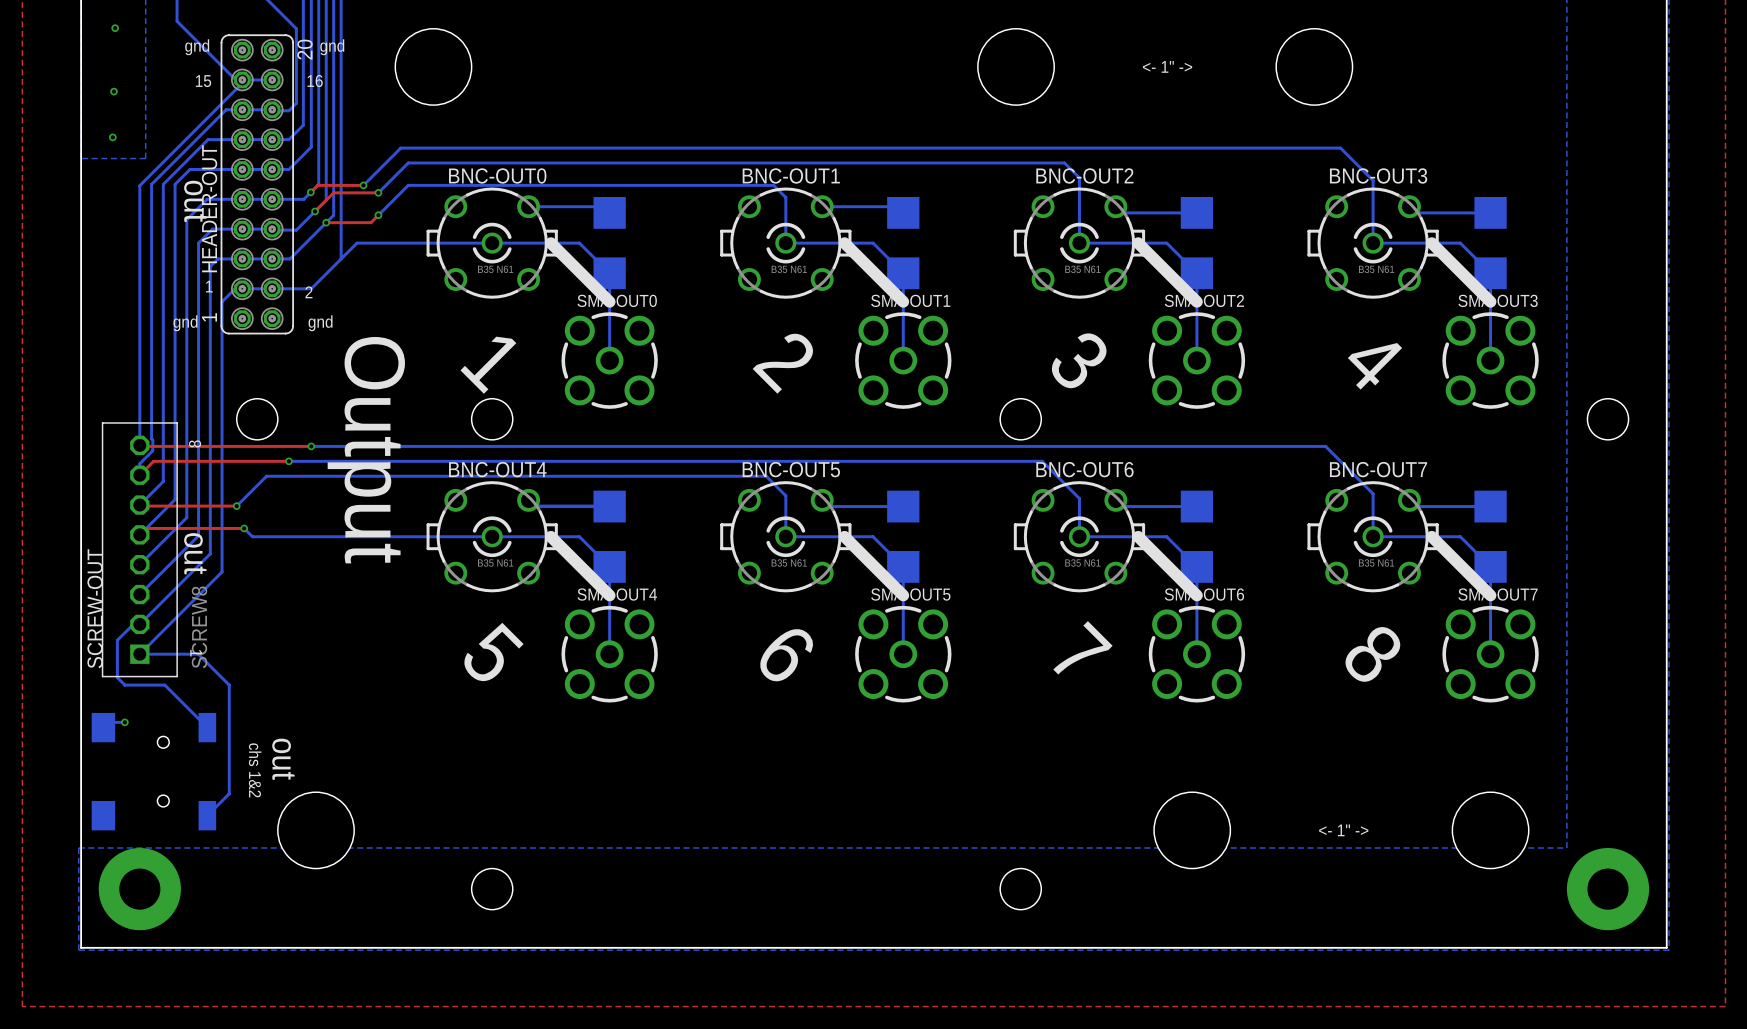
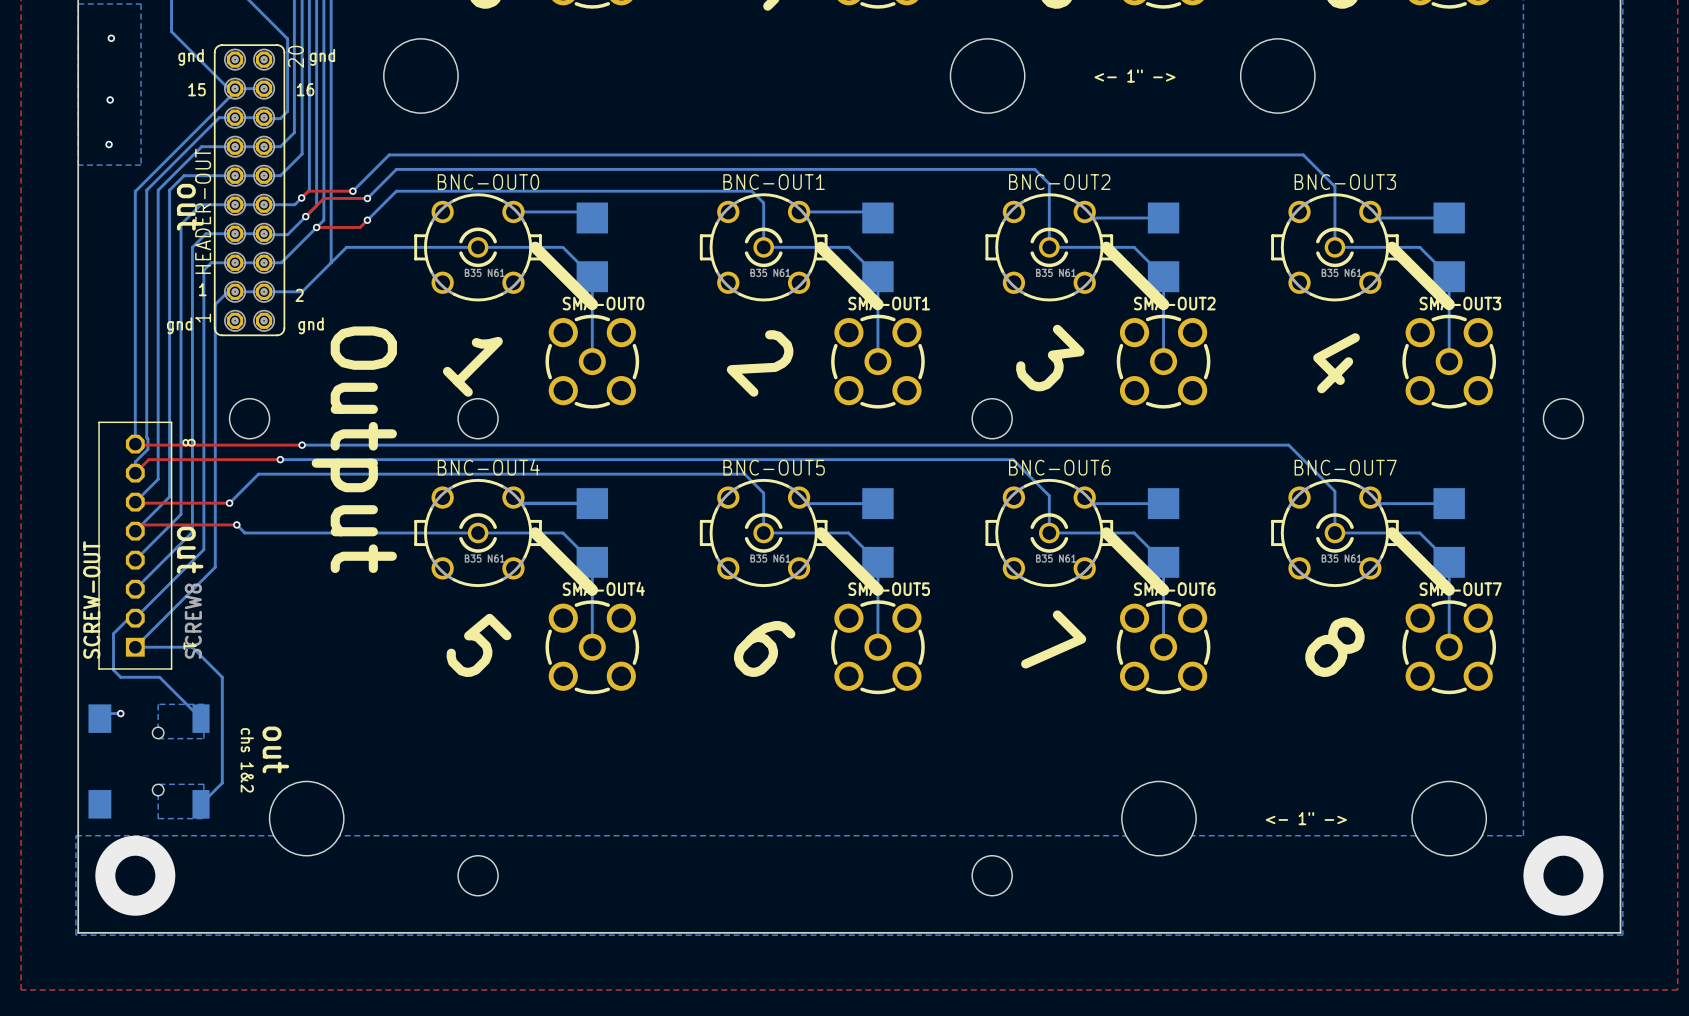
bottom zone outline: none -> (158, 704) (203, 704) (203, 738) (158, 738) (158, 704)
bottom zone outline: none -> (158, 784) (158, 818) (203, 818) (203, 784) (158, 784)

